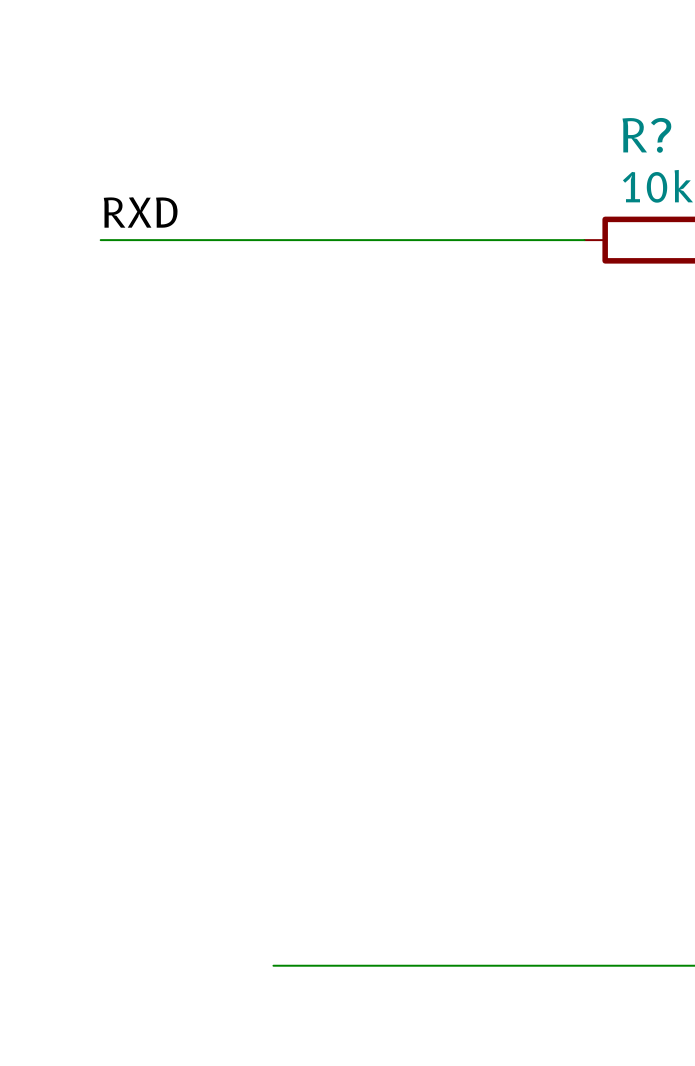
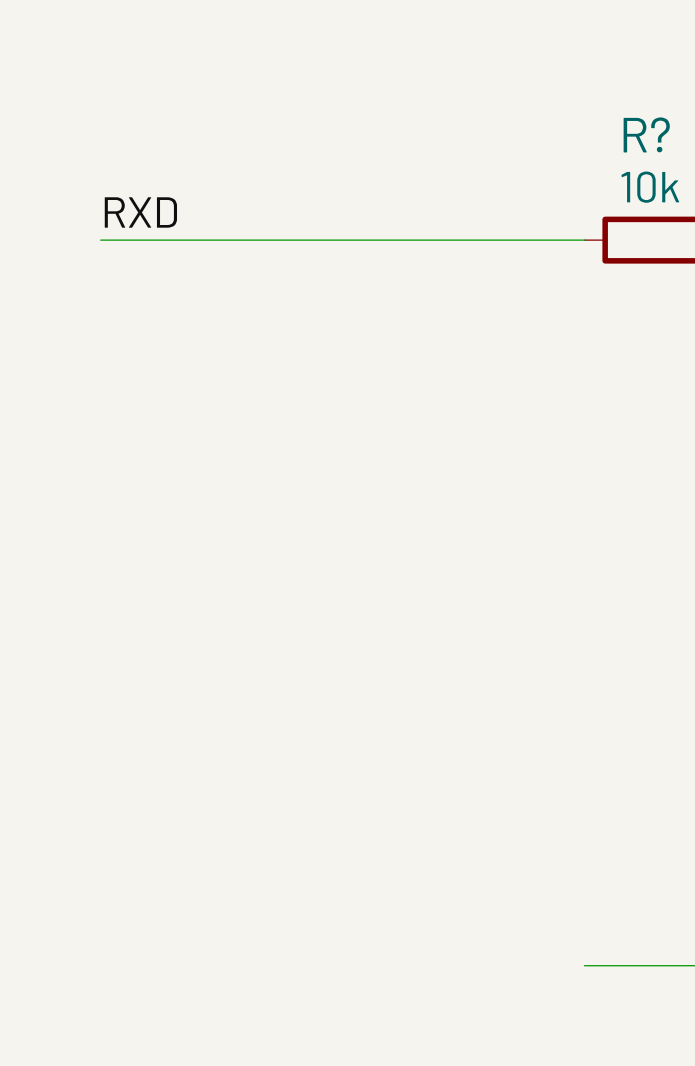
wire: (273, 965) (584, 965) -> none

